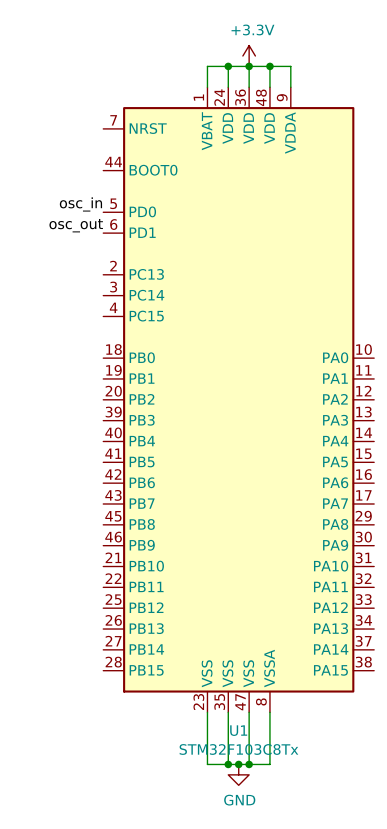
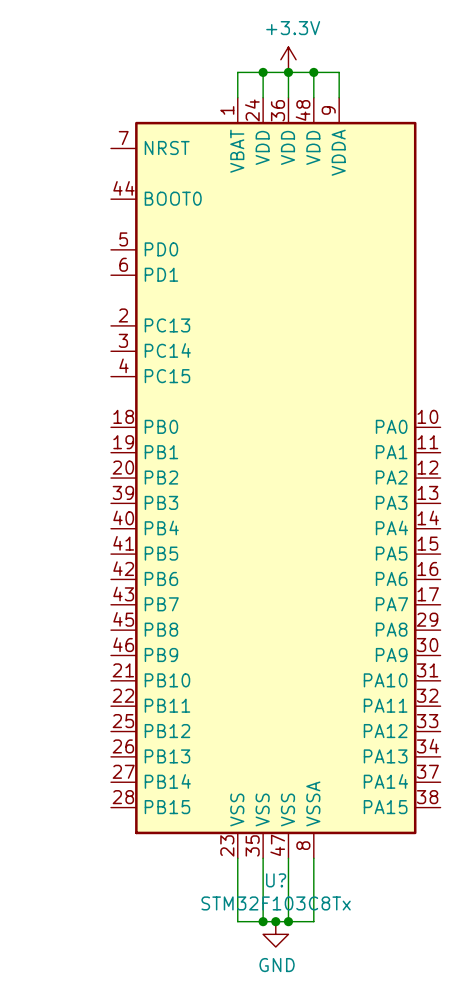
label: osc_in (80, 204) -> none
label: osc_out (76, 225) -> none
U1 name: U1 (238, 730) -> U? (276, 880)

